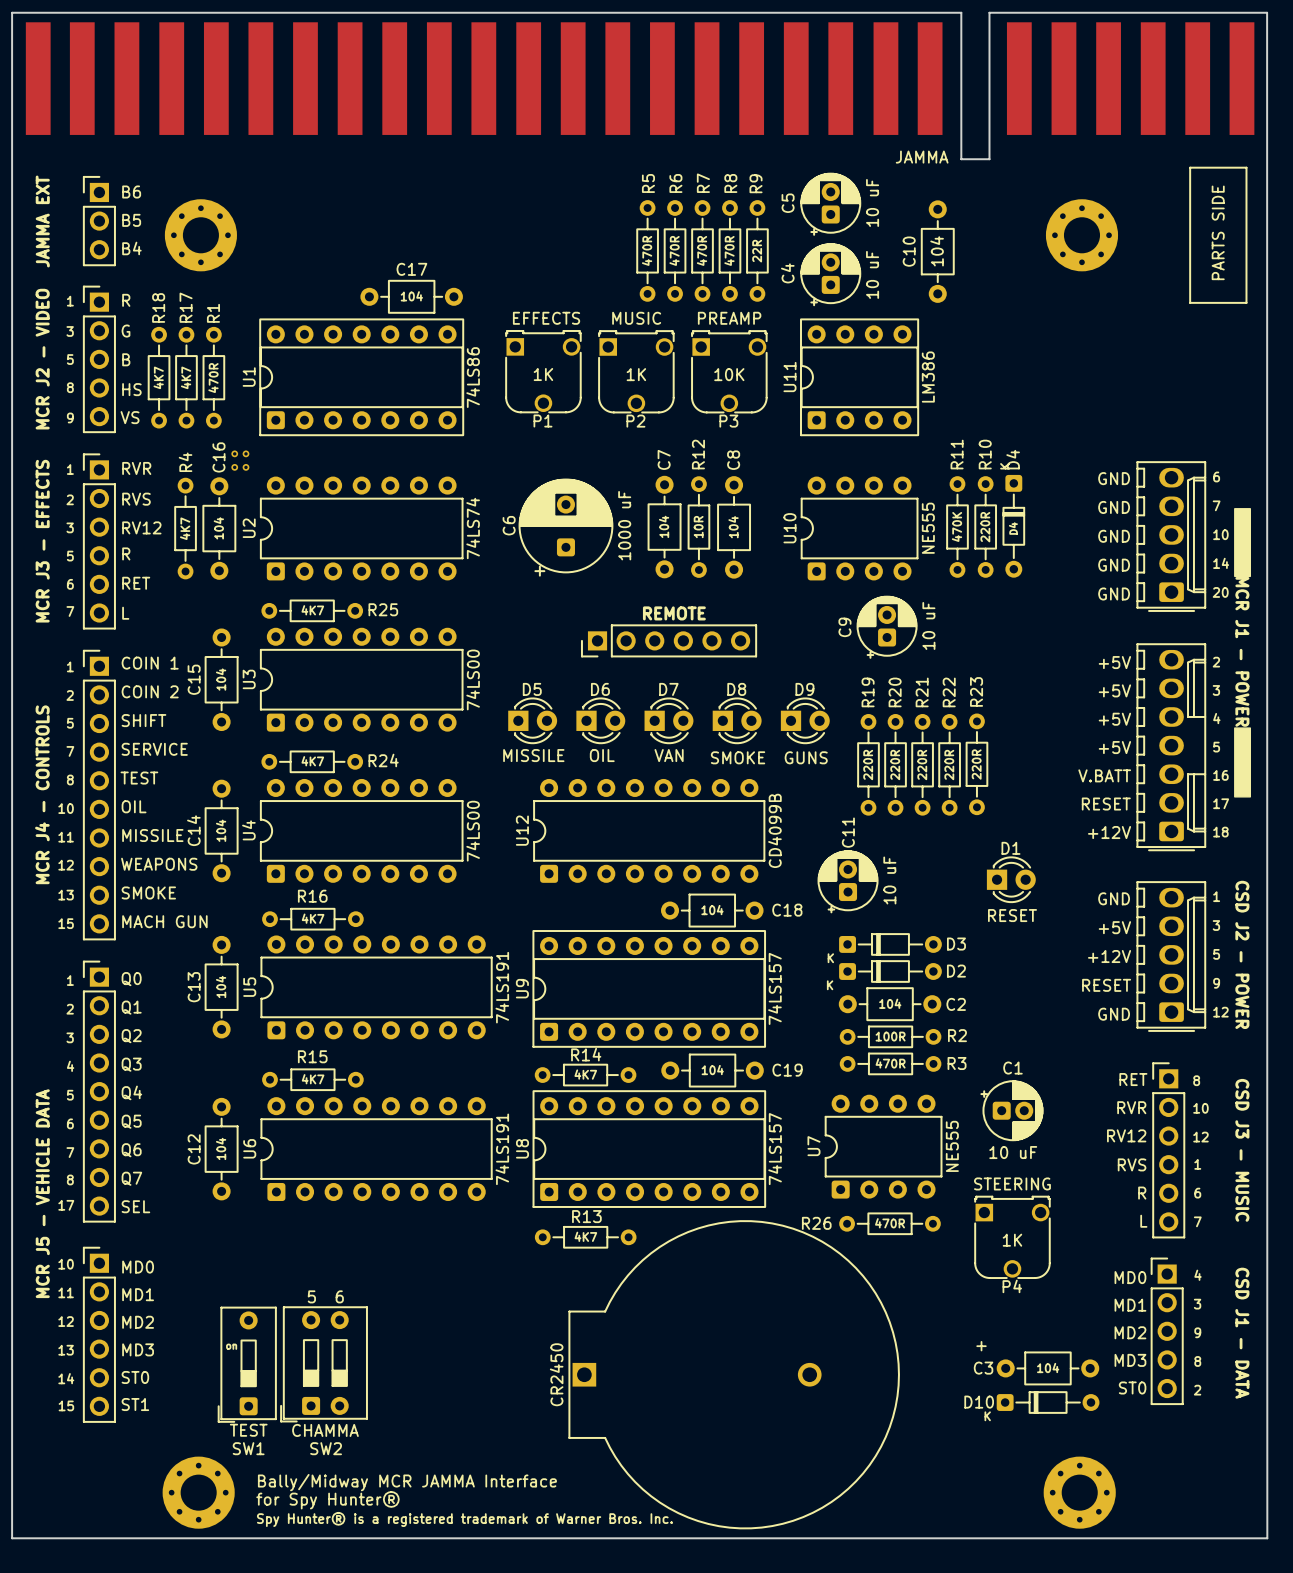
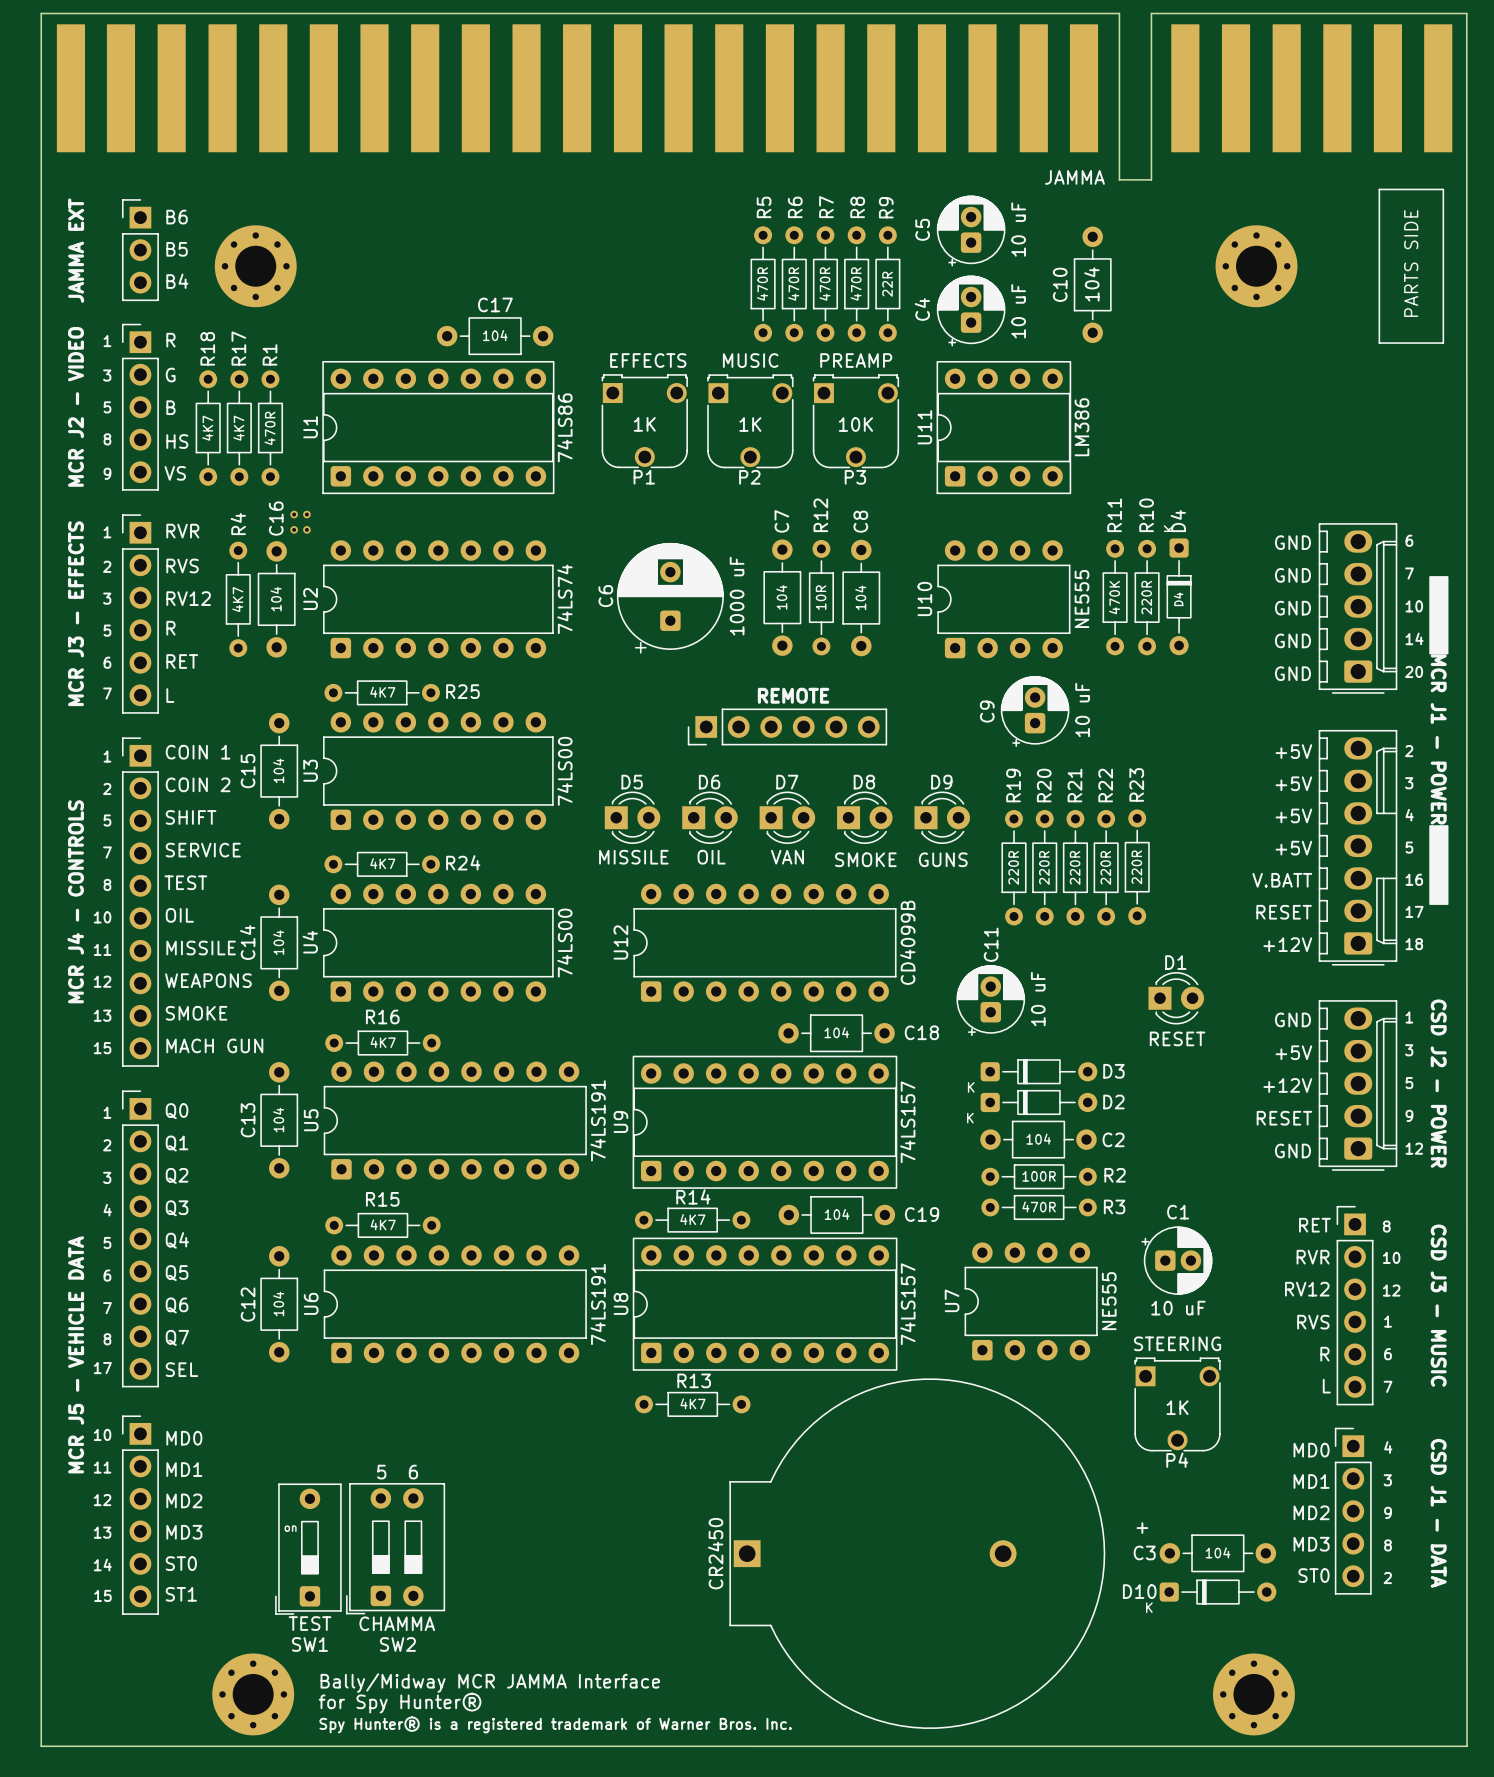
R26: (890, 1223) -> none
CR2450 position: (734, 1374) -> (917, 1553)

